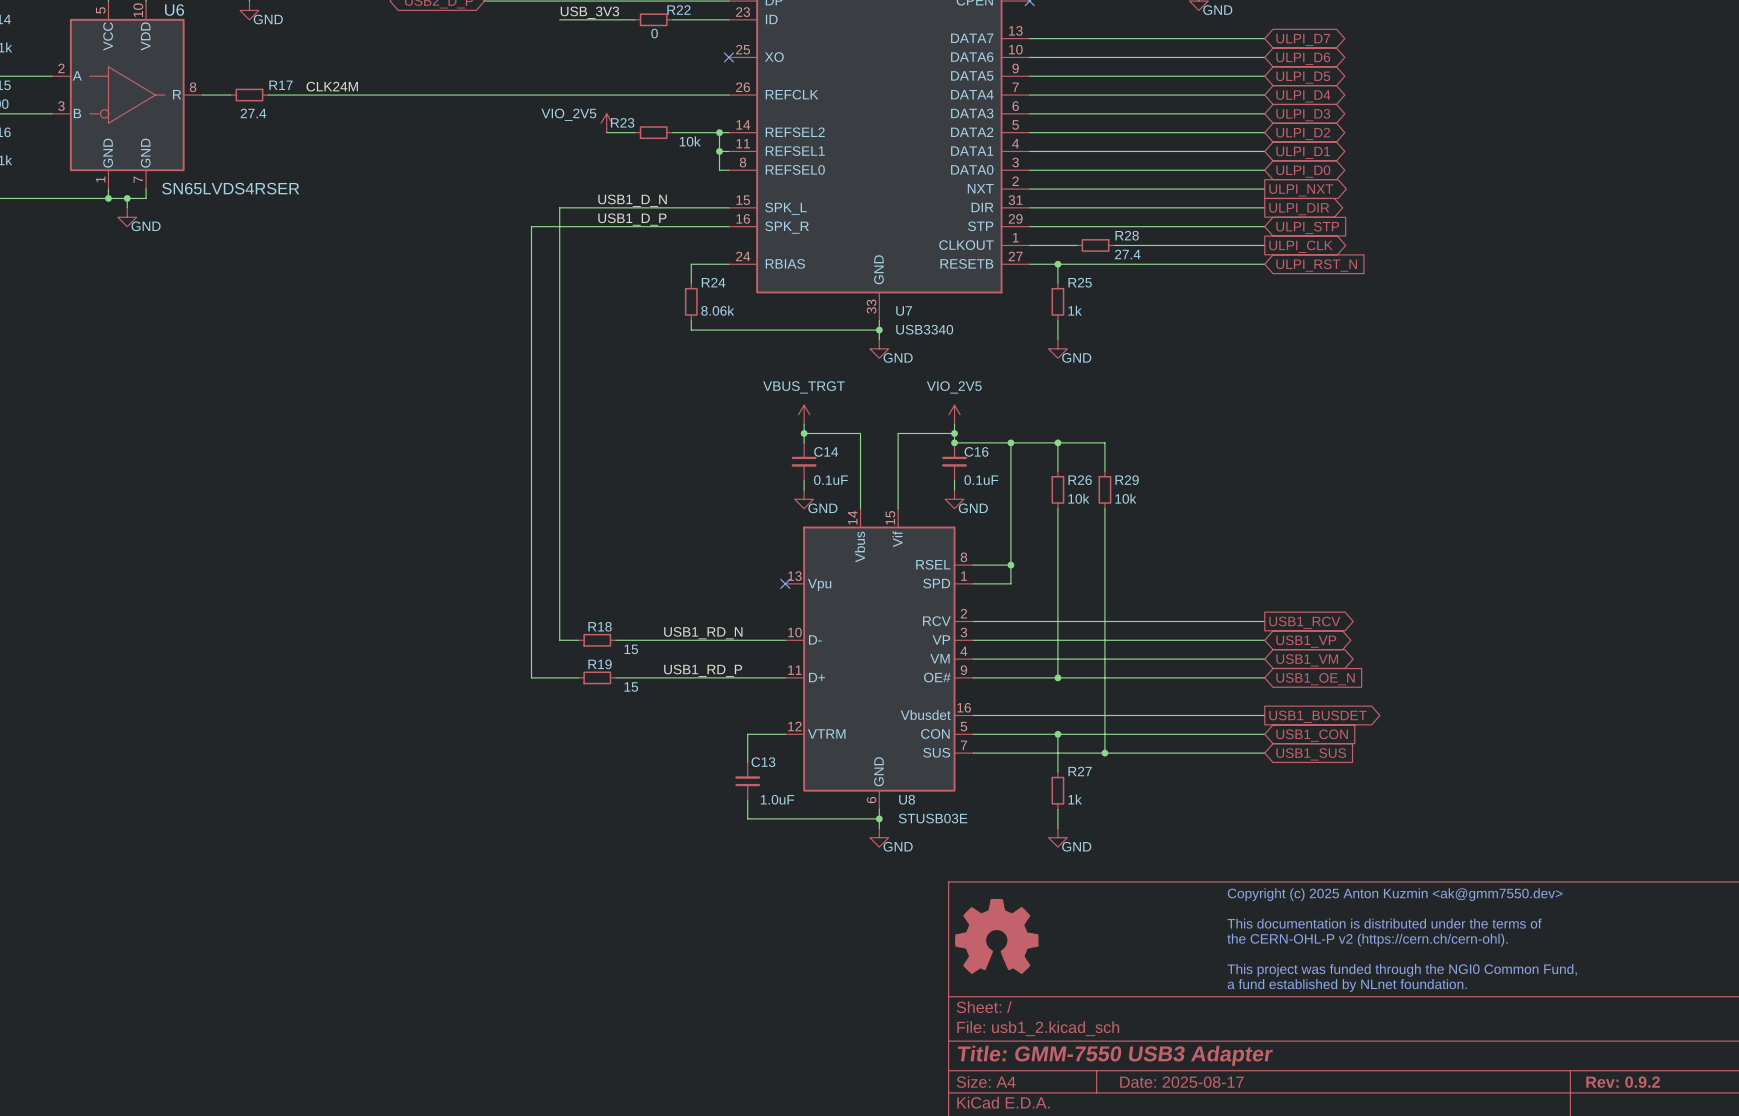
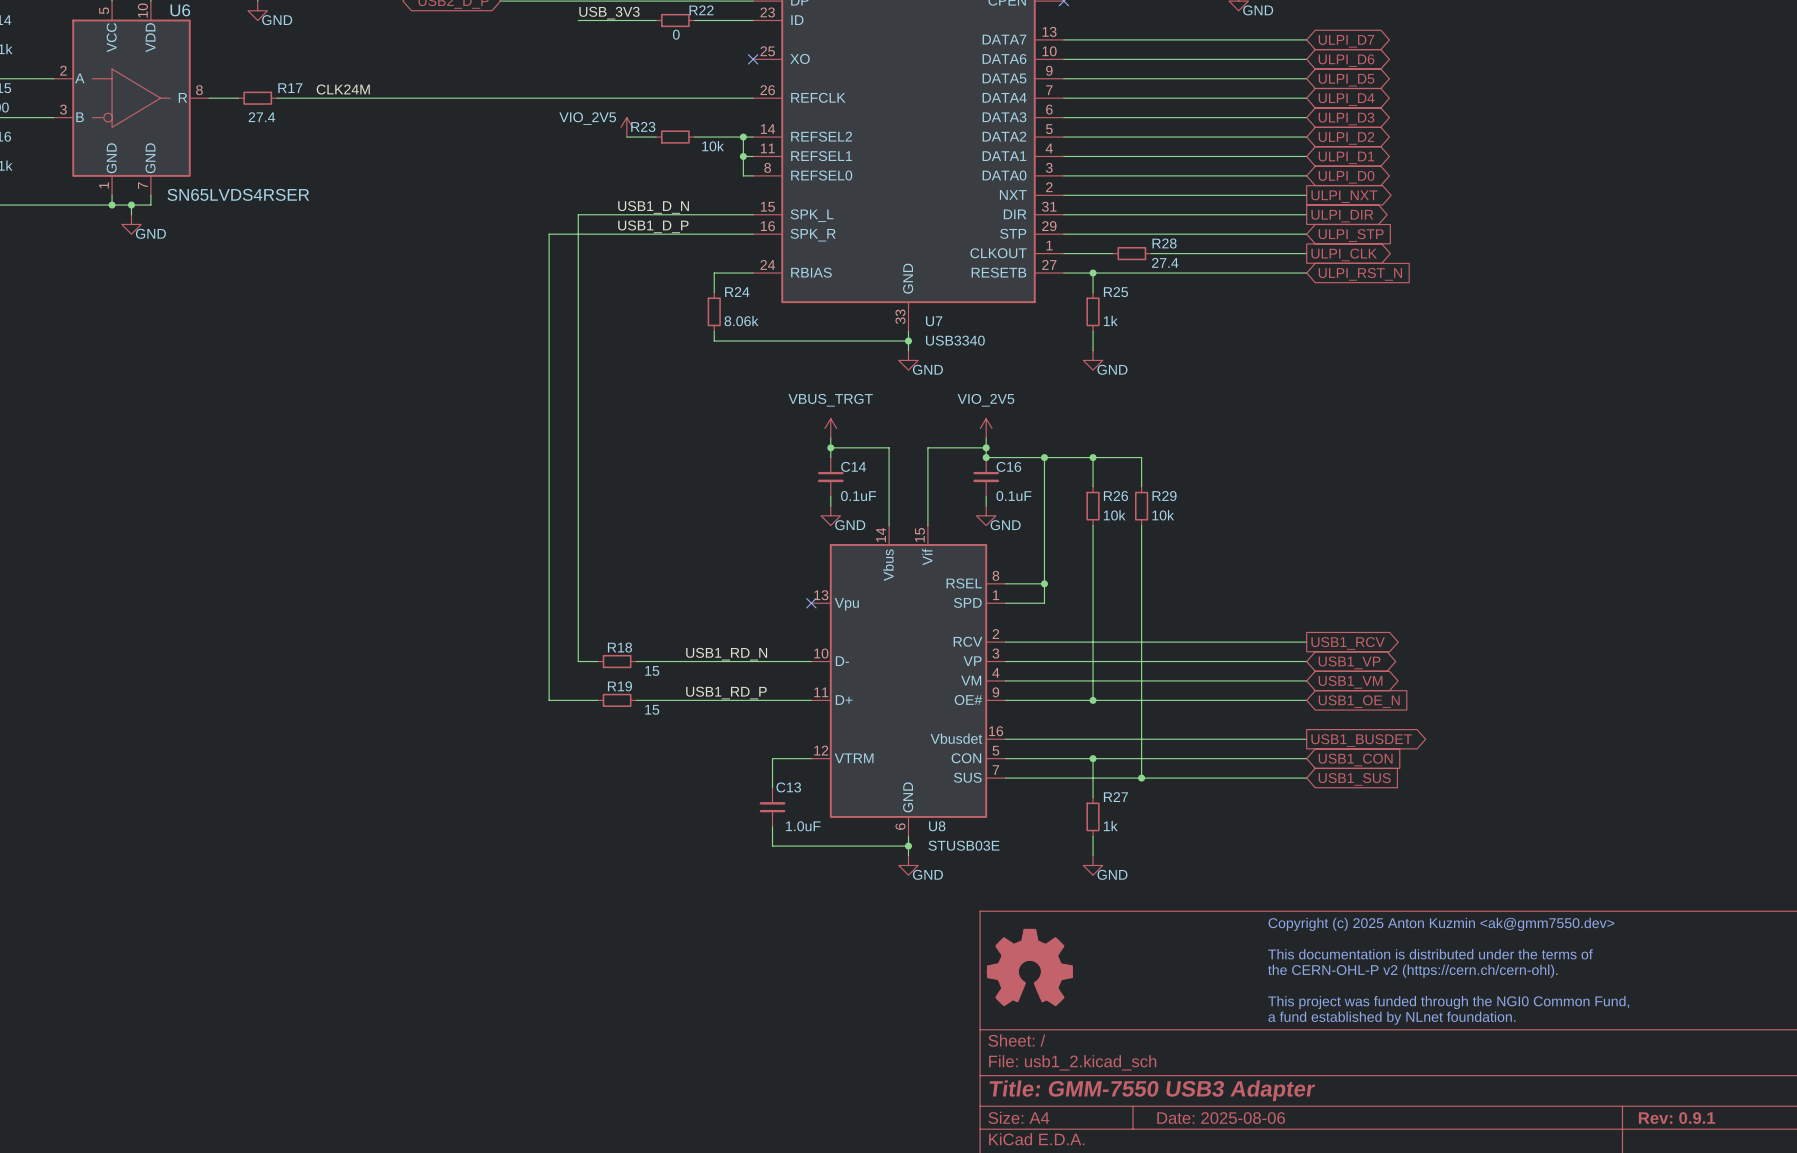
title block: Date: 2025-08-17 (1181, 1082) -> Date: 2025-08-06 (1221, 1118)
title block: Rev: 0.9.2 (1623, 1082) -> Rev: 0.9.1 (1677, 1118)

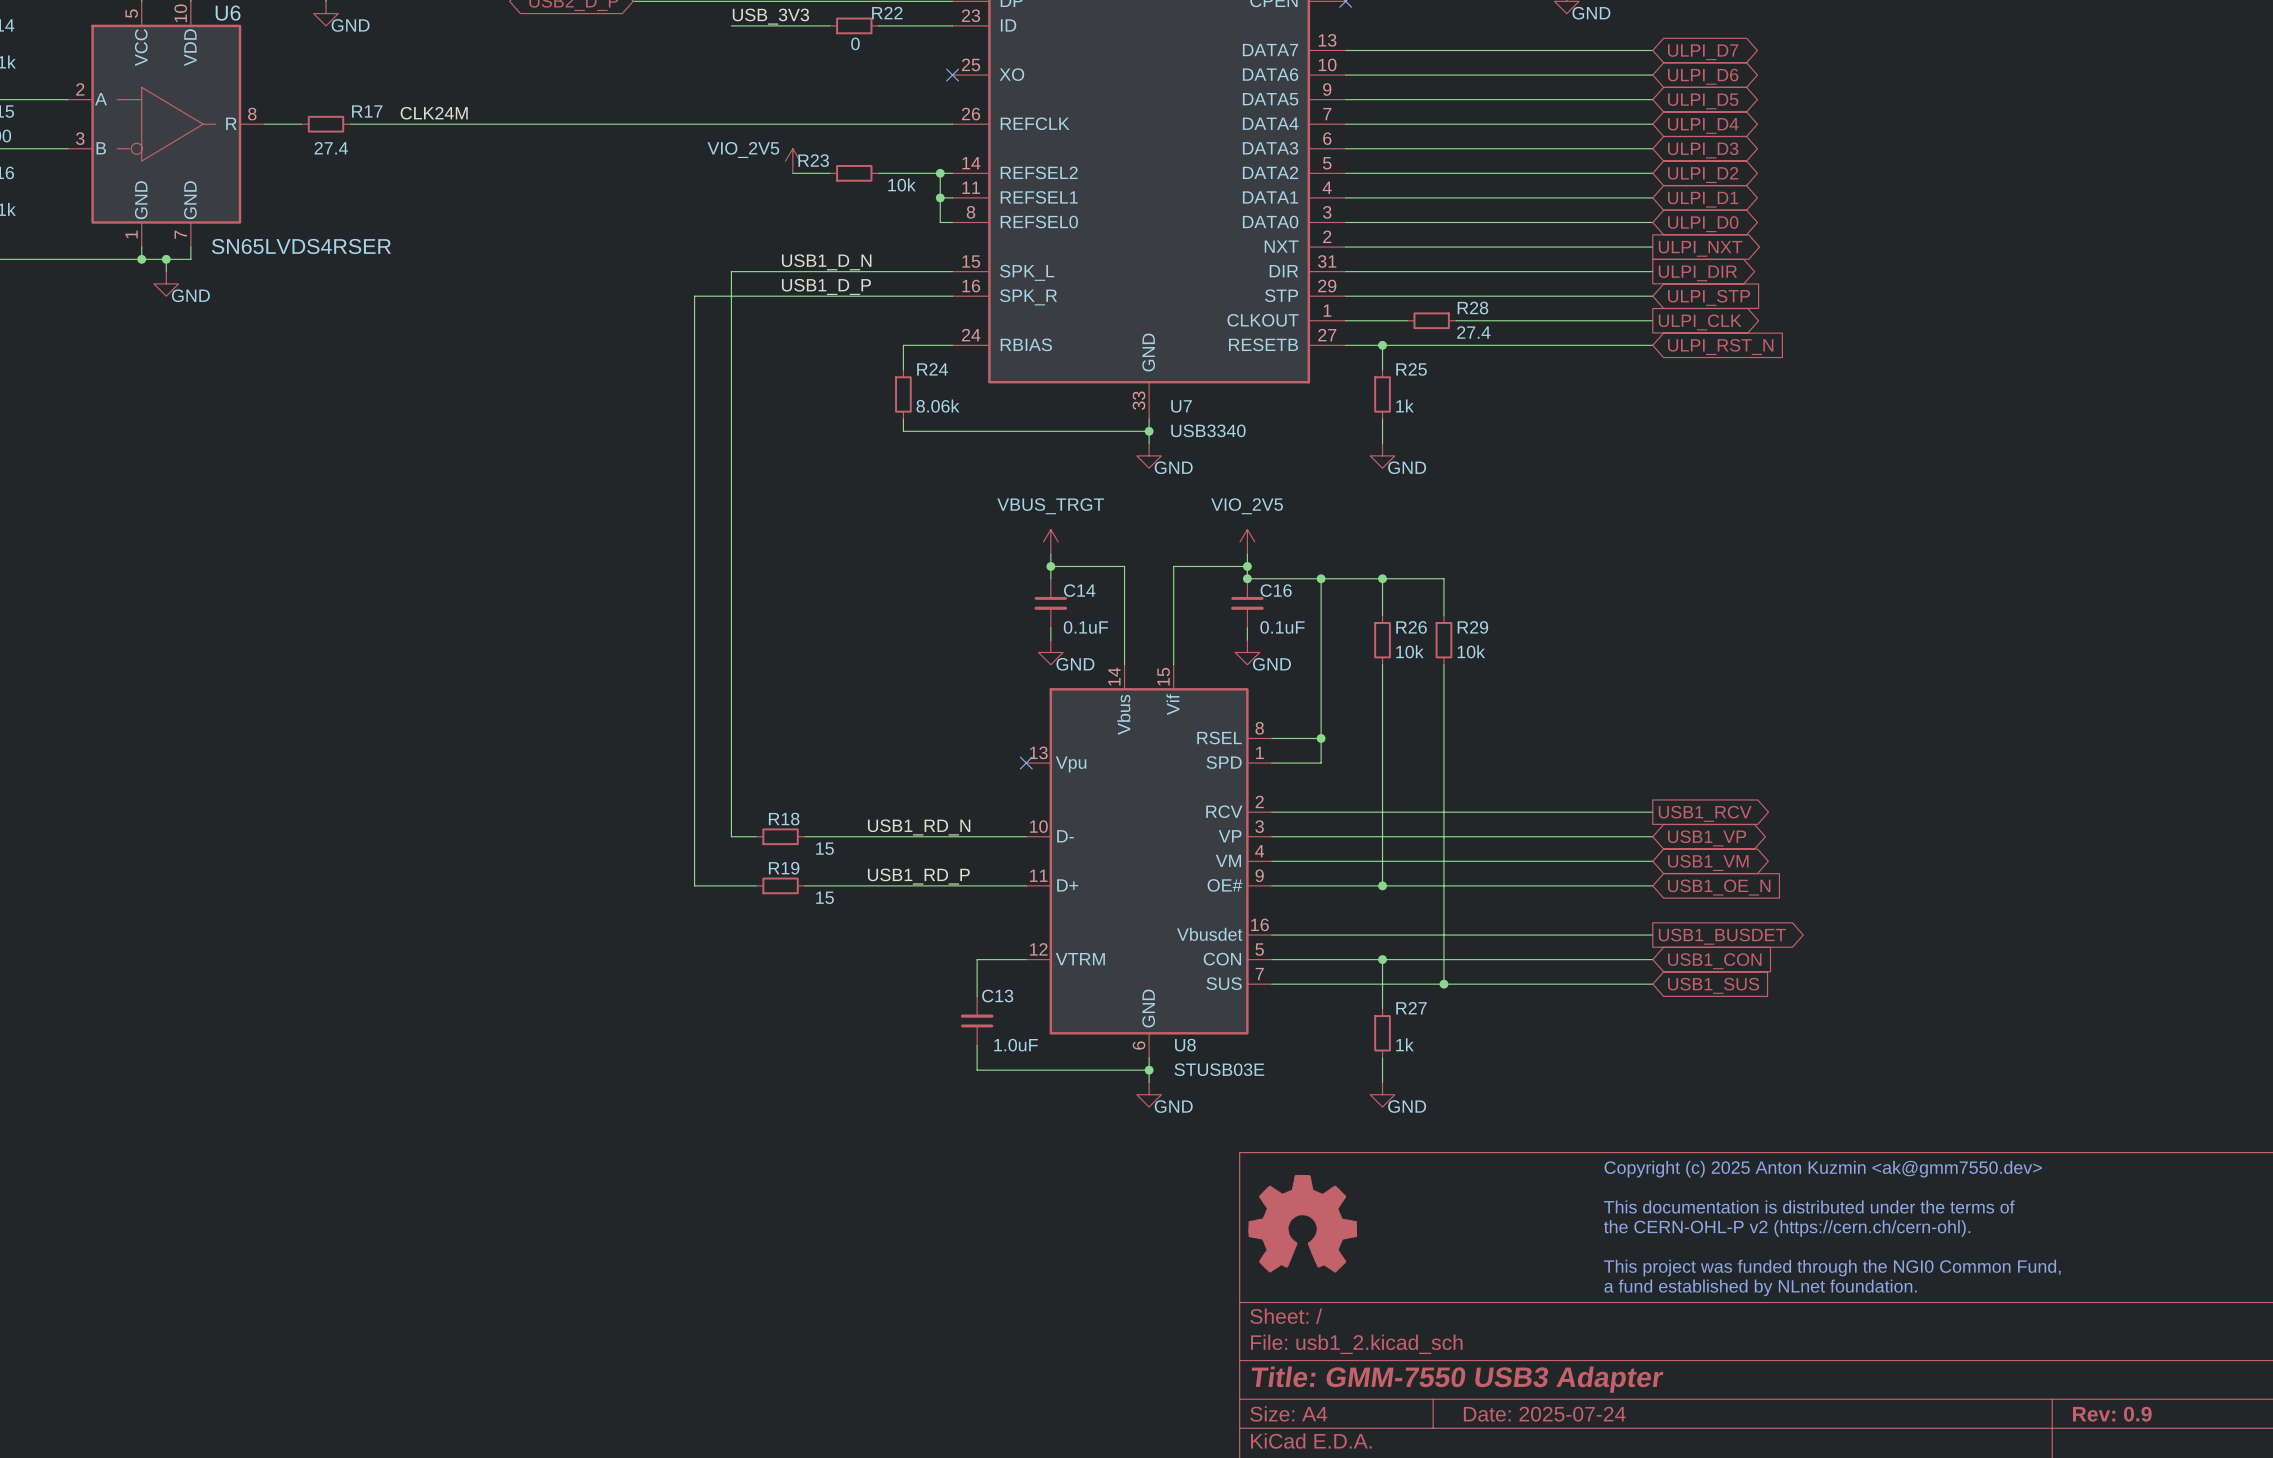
title block: Date: 2025-08-06 (1221, 1118) -> Date: 2025-07-24 (1544, 1414)
title block: Rev: 0.9.1 (1677, 1118) -> Rev: 0.9 (2112, 1414)

